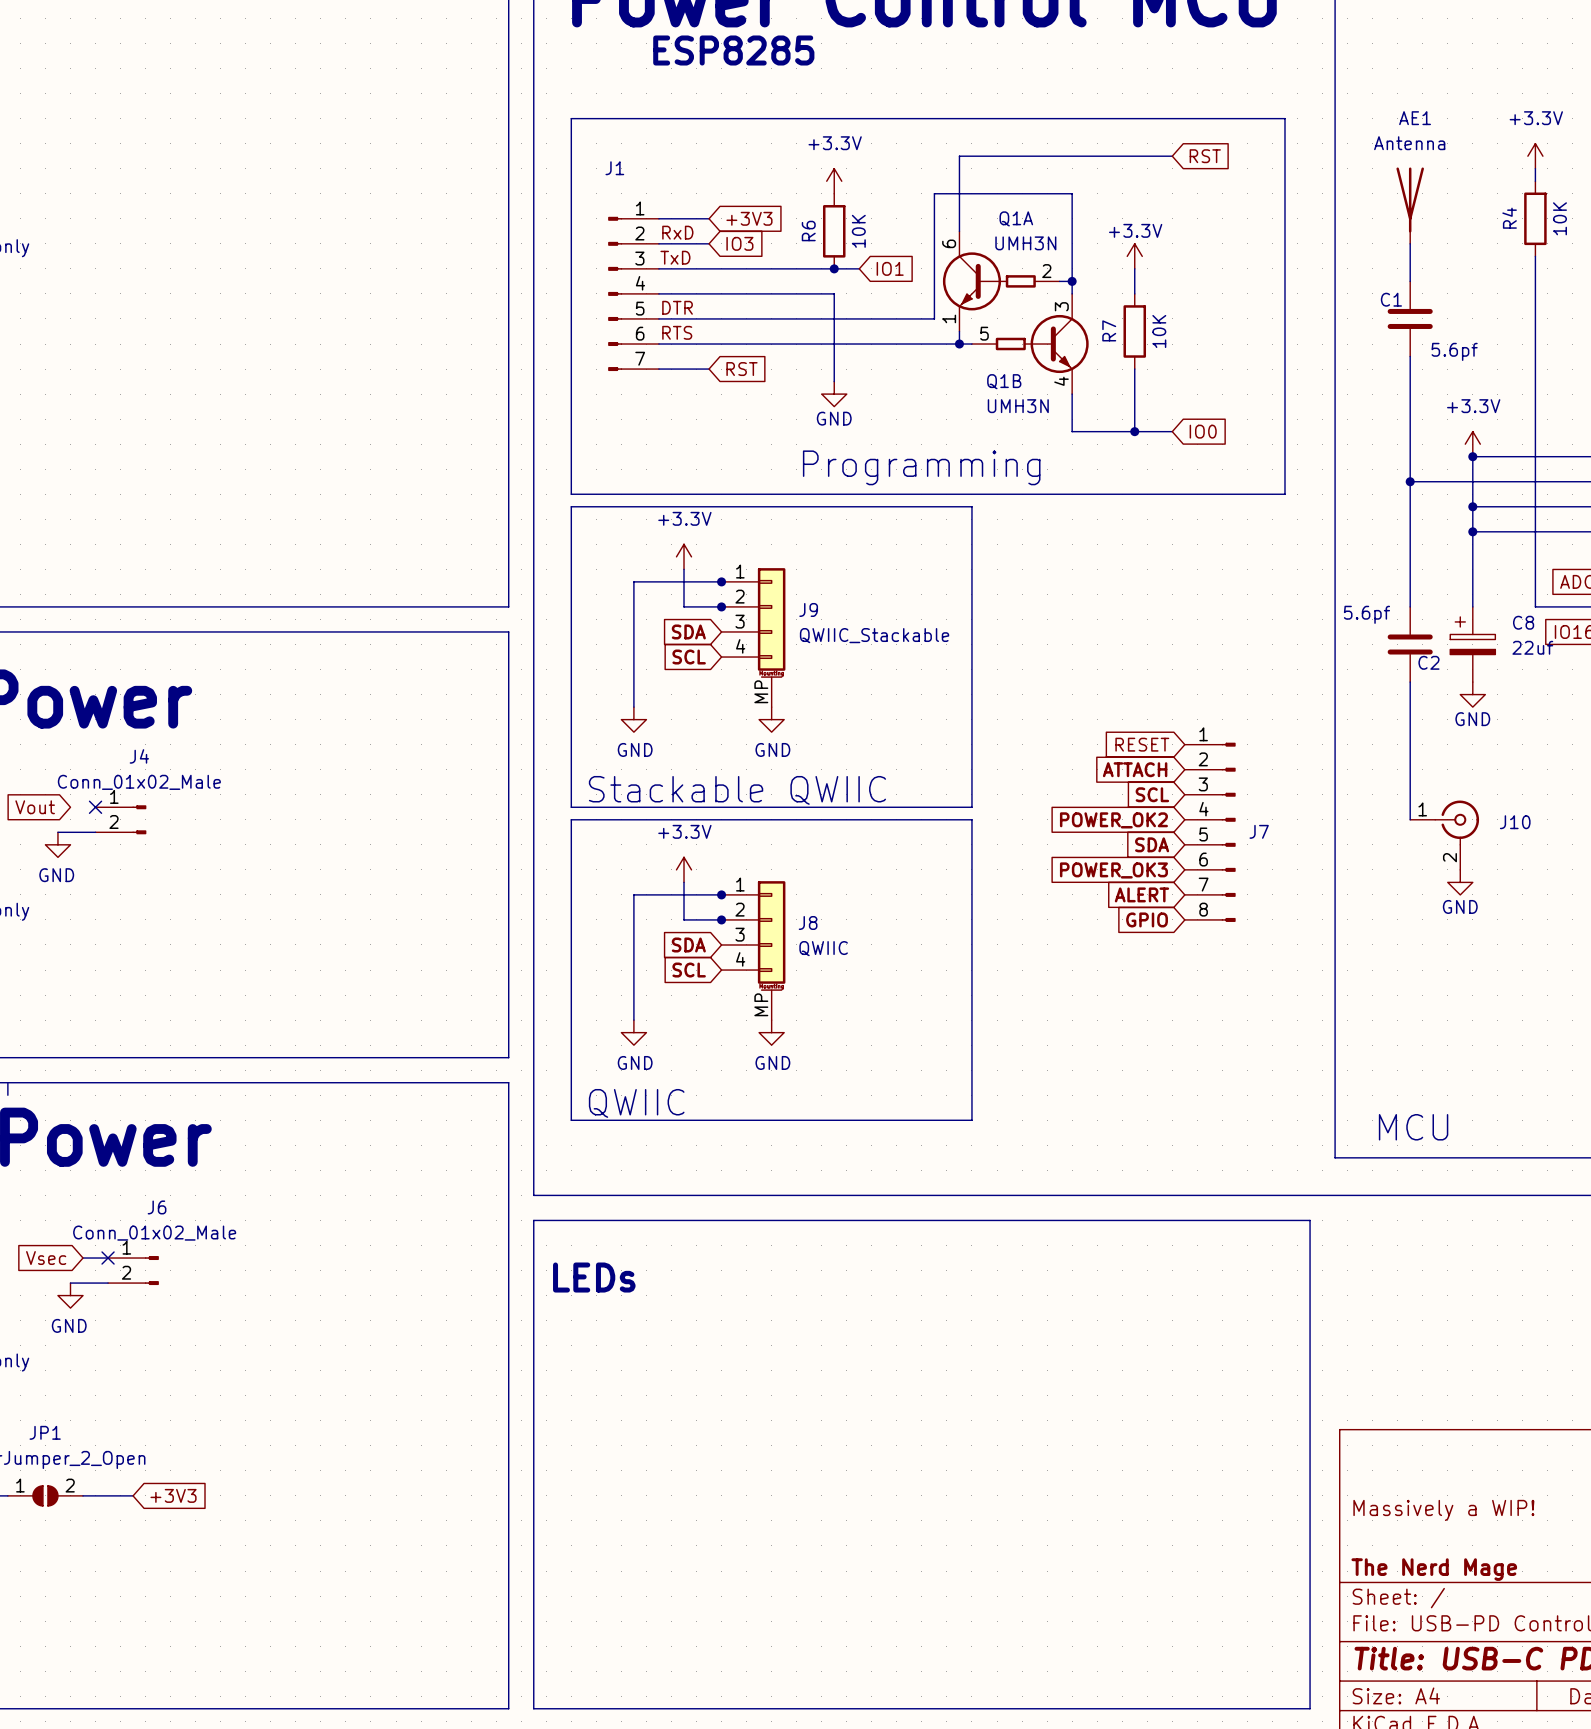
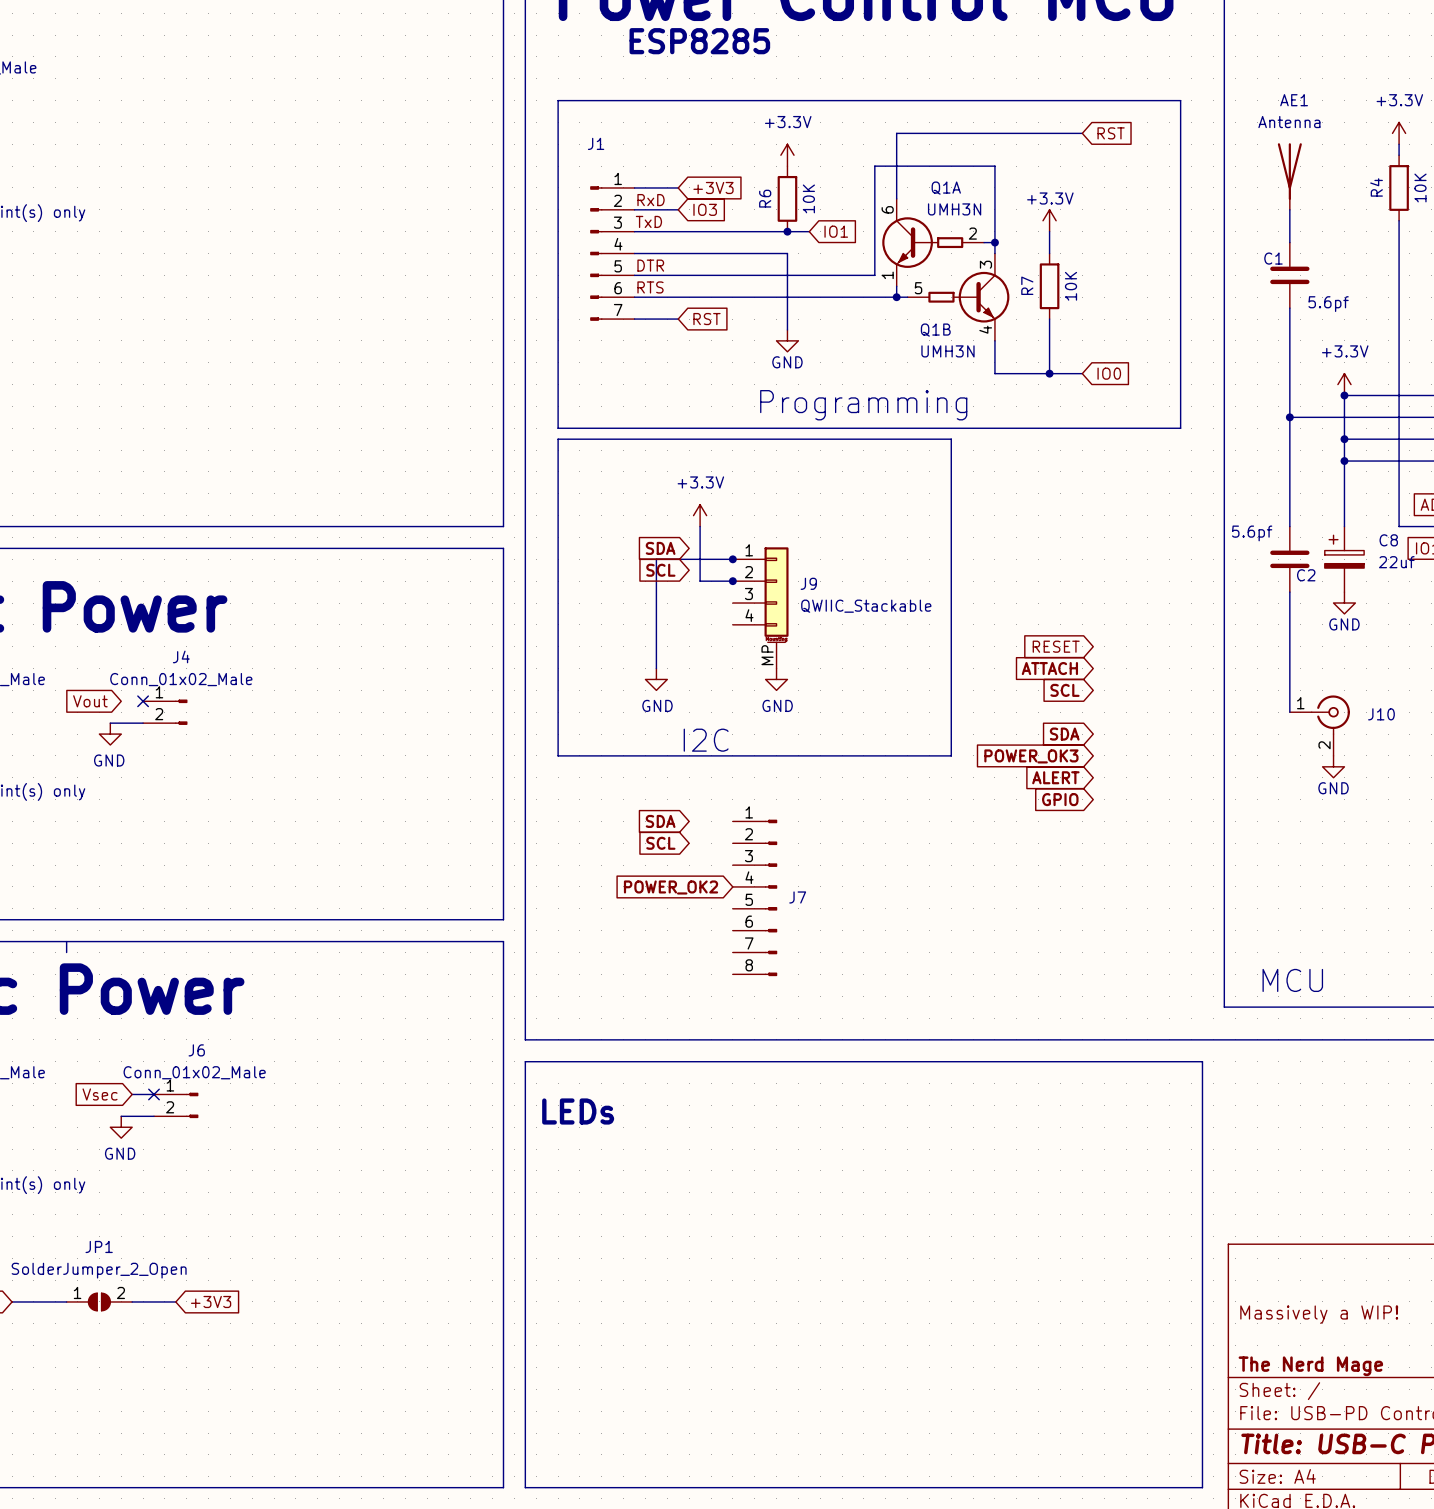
line: (971, 506) (971, 807) (571, 807) -> (907, 439) (951, 439) (951, 755) (558, 755)
power symbol position: +3.3V (684, 556) -> +3.3V (700, 515)
wire: (684, 569) (684, 606) (721, 607) -> none
junction: (721, 581) -> none
wire: (721, 582) (633, 581) (633, 707) -> (732, 559) (656, 559) (656, 668)
junction: (721, 606) -> none
wire: none -> (700, 526) (700, 581) (732, 581)
J9 position: (753, 637) -> (760, 607)
junction: none -> (732, 559)
junction: none -> (732, 581)
power symbol: GND (633, 719) -> none
power symbol: GND (771, 719) -> none
power symbol: none -> GND (656, 679)
power symbol: none -> GND (776, 679)
text: Stackable QWIIC (737, 790) -> none
line: (571, 819) (971, 819) (971, 1120) (571, 1120) (571, 869) -> (558, 712) (558, 701)
global label: POWER_OK2 (1113, 820) -> none
J7 position: (1210, 832) -> (755, 897)
text: none -> I2C (706, 740)
power symbol: +3.3V (684, 869) -> none
wire: (684, 882) (684, 919) (721, 920) -> none
junction: (721, 894) -> none
wire: (721, 895) (633, 894) (633, 1020) -> none
junction: (721, 919) -> none
J8: QWIIC (753, 950) -> none
global label: none -> POWER_OK2 (671, 887)
power symbol: GND (633, 1032) -> none
power symbol: GND (771, 1032) -> none
text: QWIIC (636, 1103) -> none

